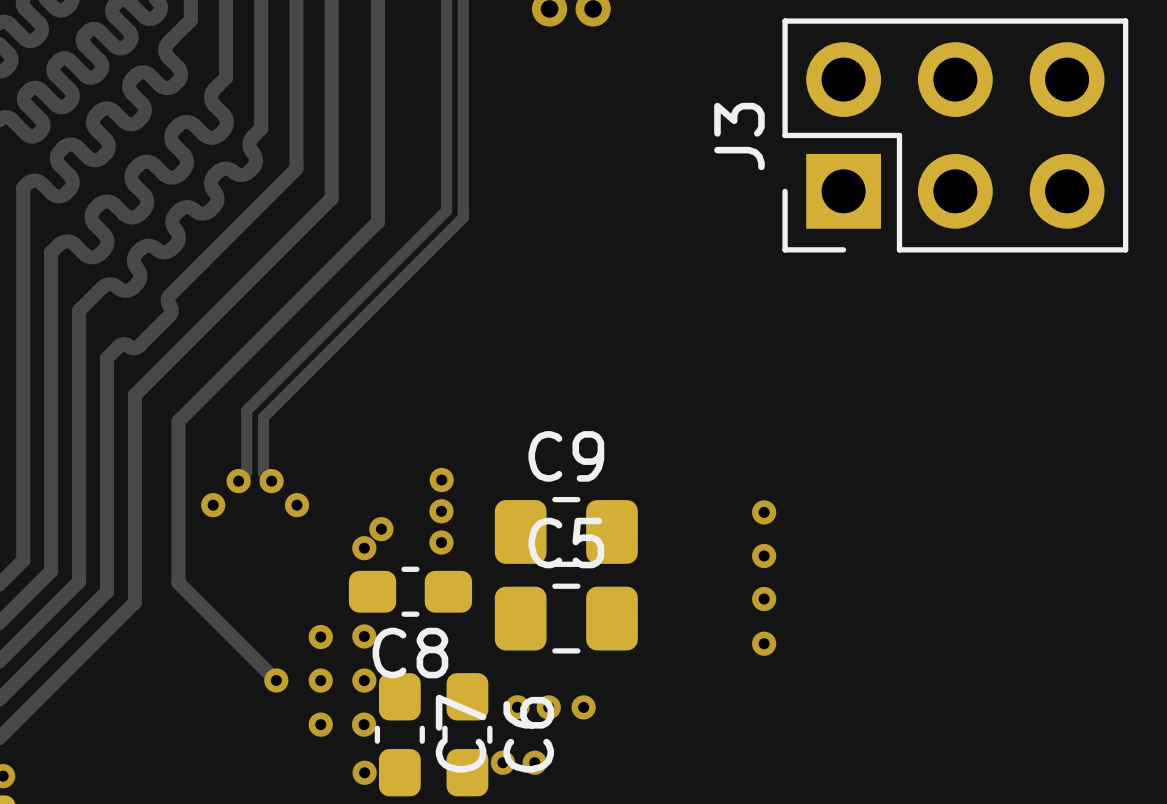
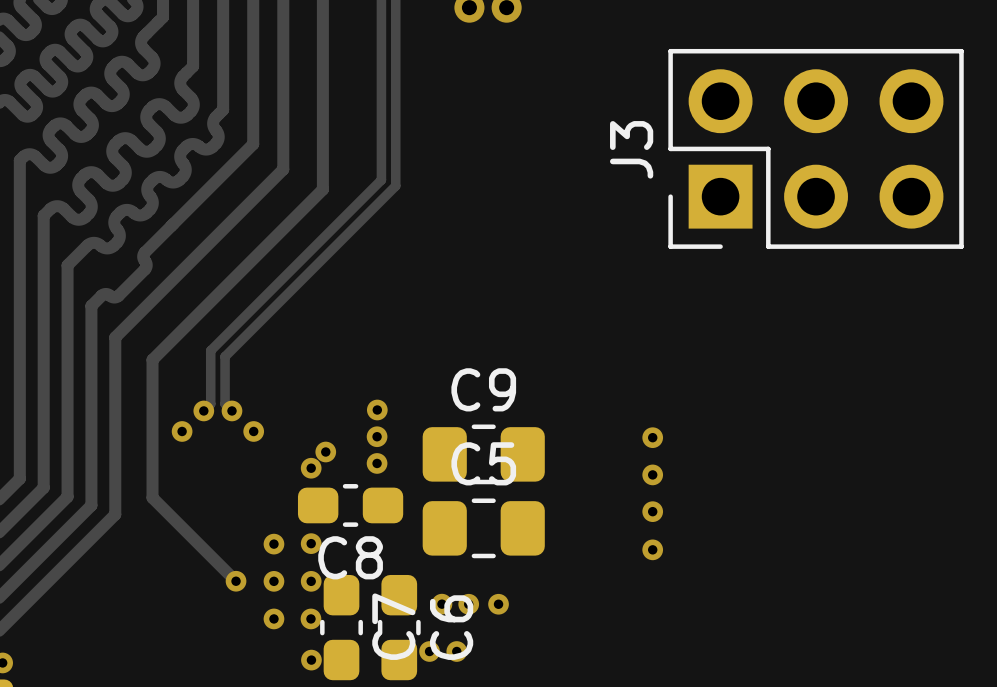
J3 position: (955, 135) -> (816, 148)

